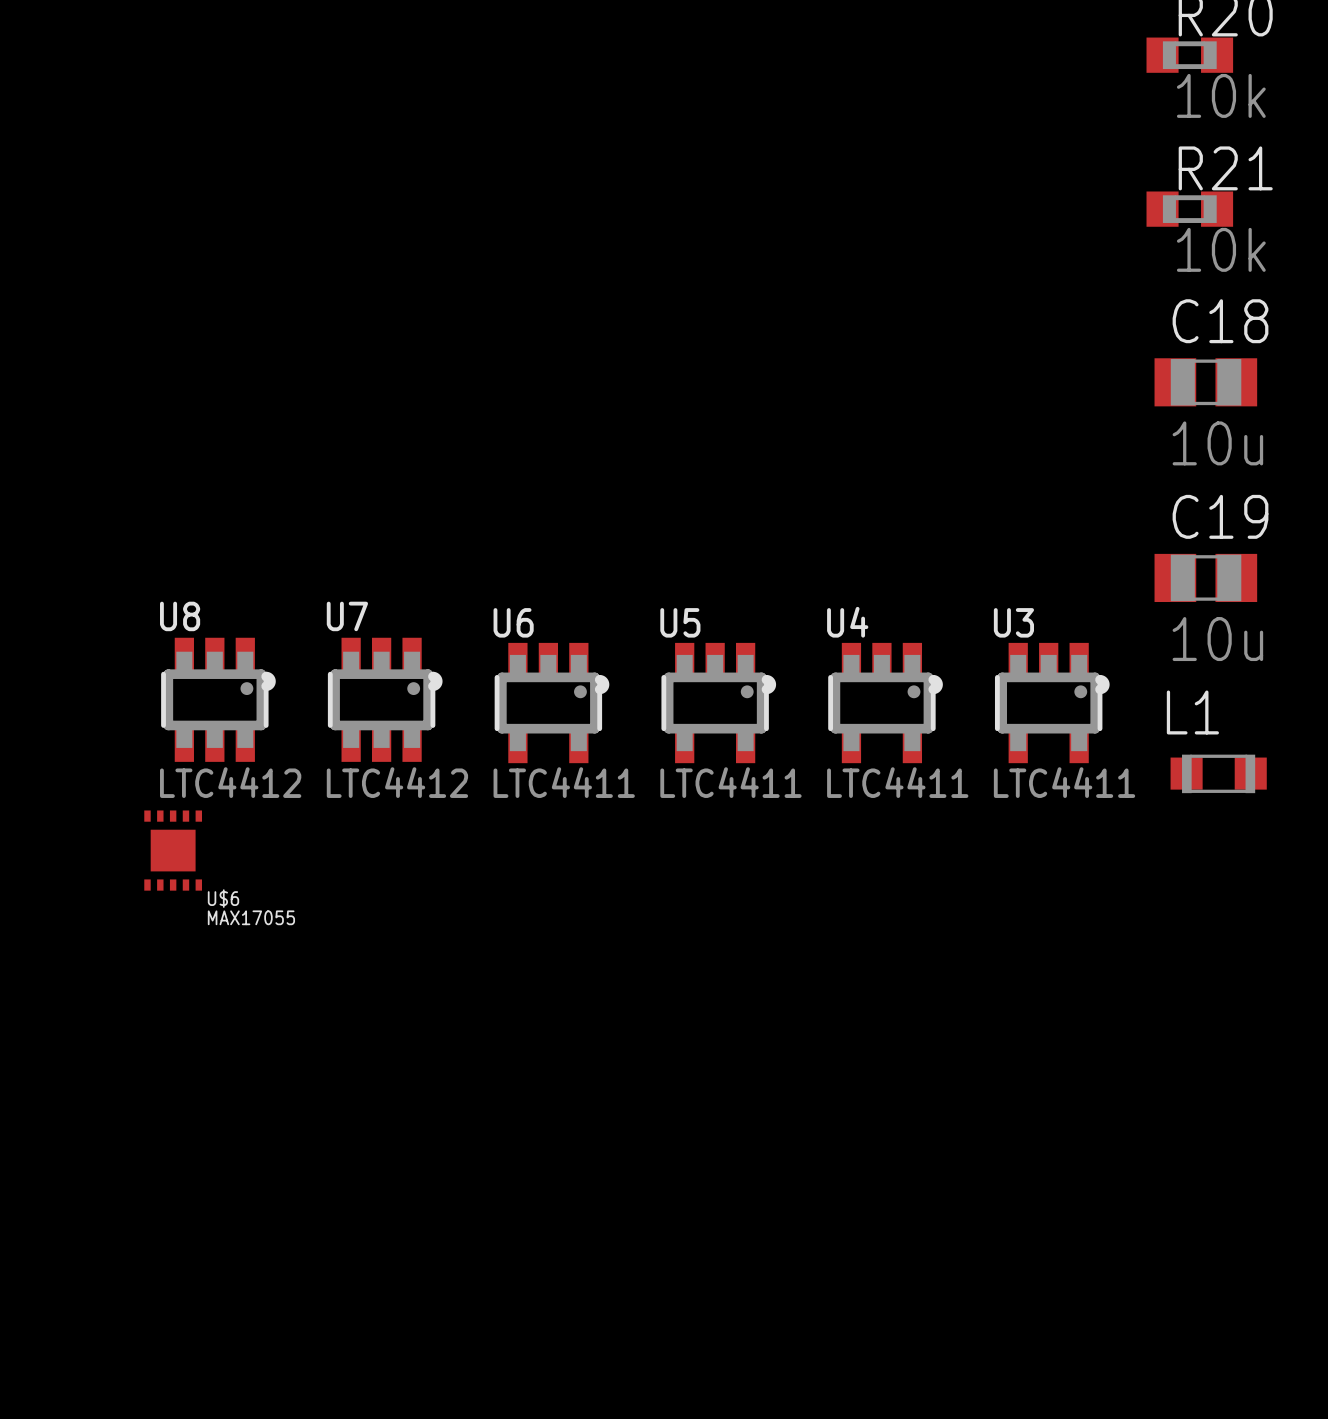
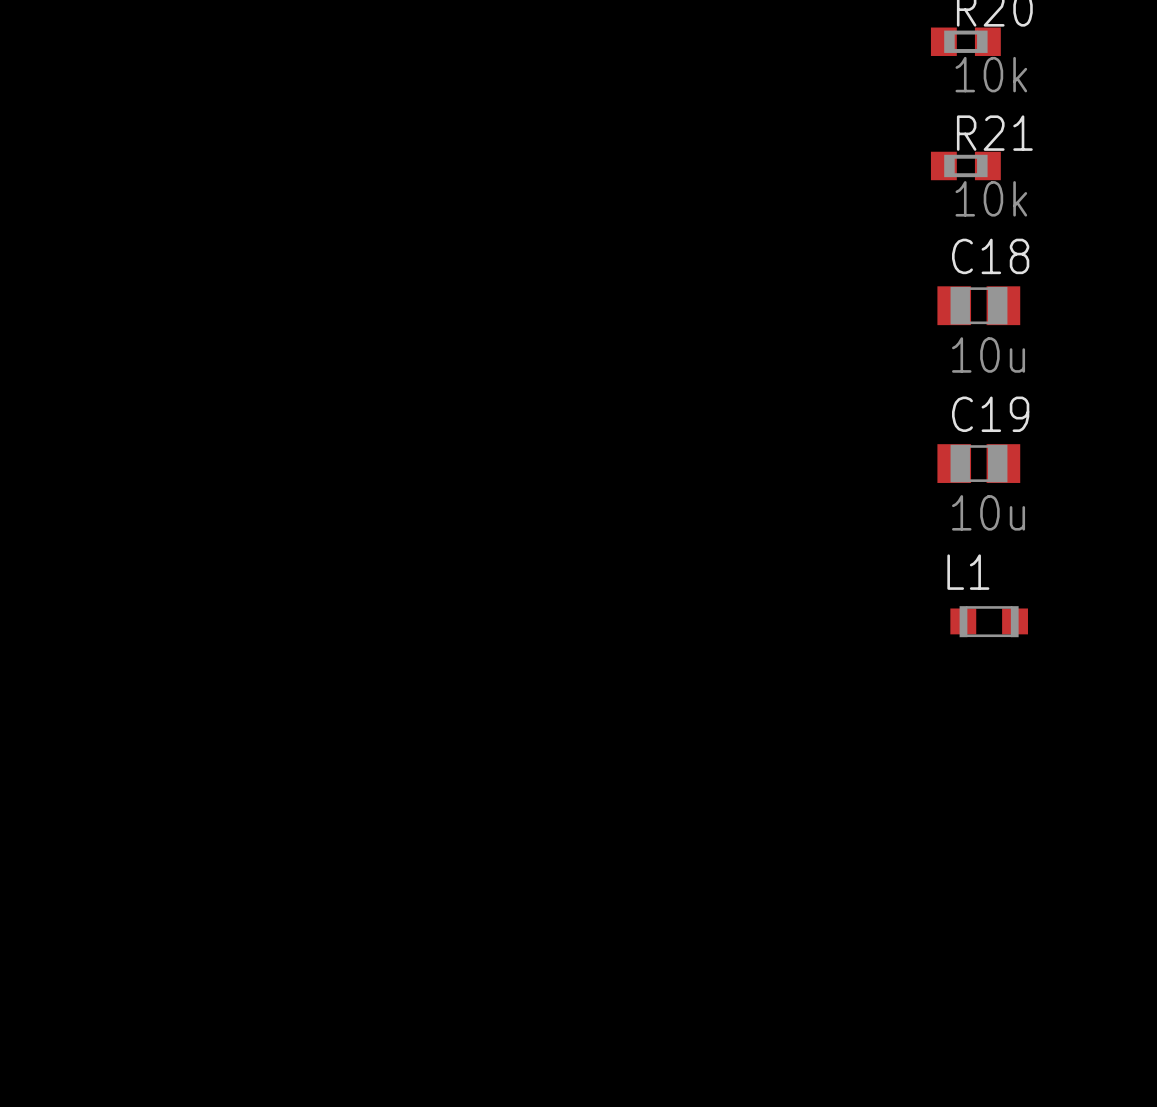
U8: LTC4412 (218, 699) -> none
U7: LTC4412 (385, 699) -> none
U6: LTC4411 (551, 703) -> none
U5: LTC4411 (718, 703) -> none
U4: LTC4411 (885, 703) -> none
U3: LTC4411 (1052, 703) -> none
U$6: MAX17055 (173, 850) -> none

